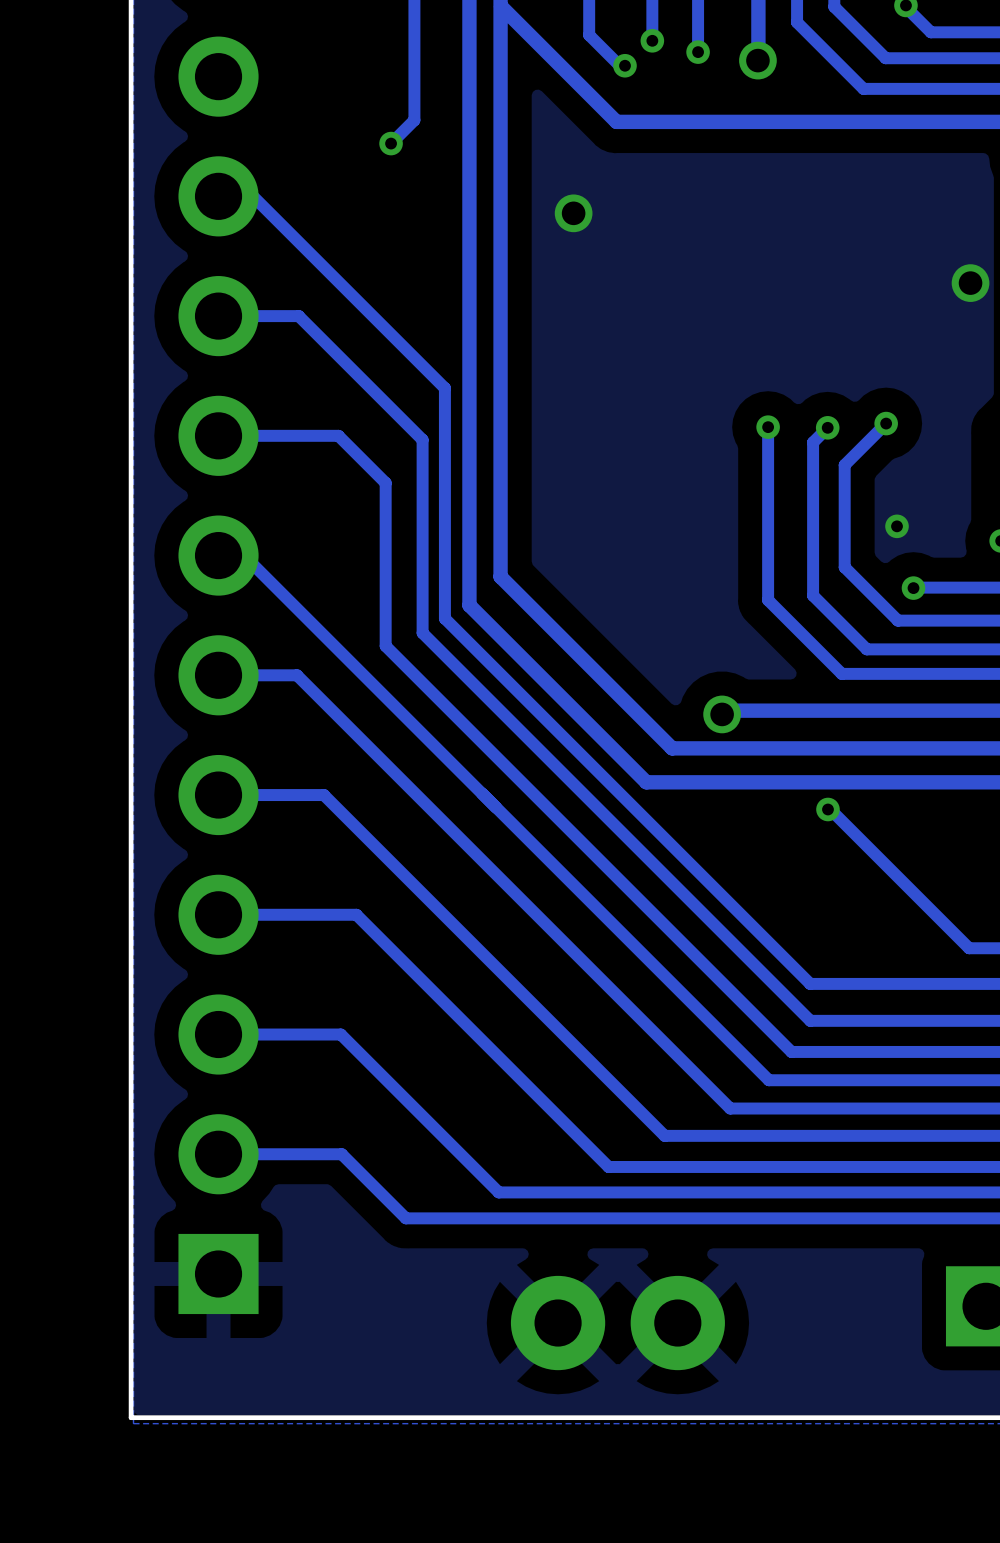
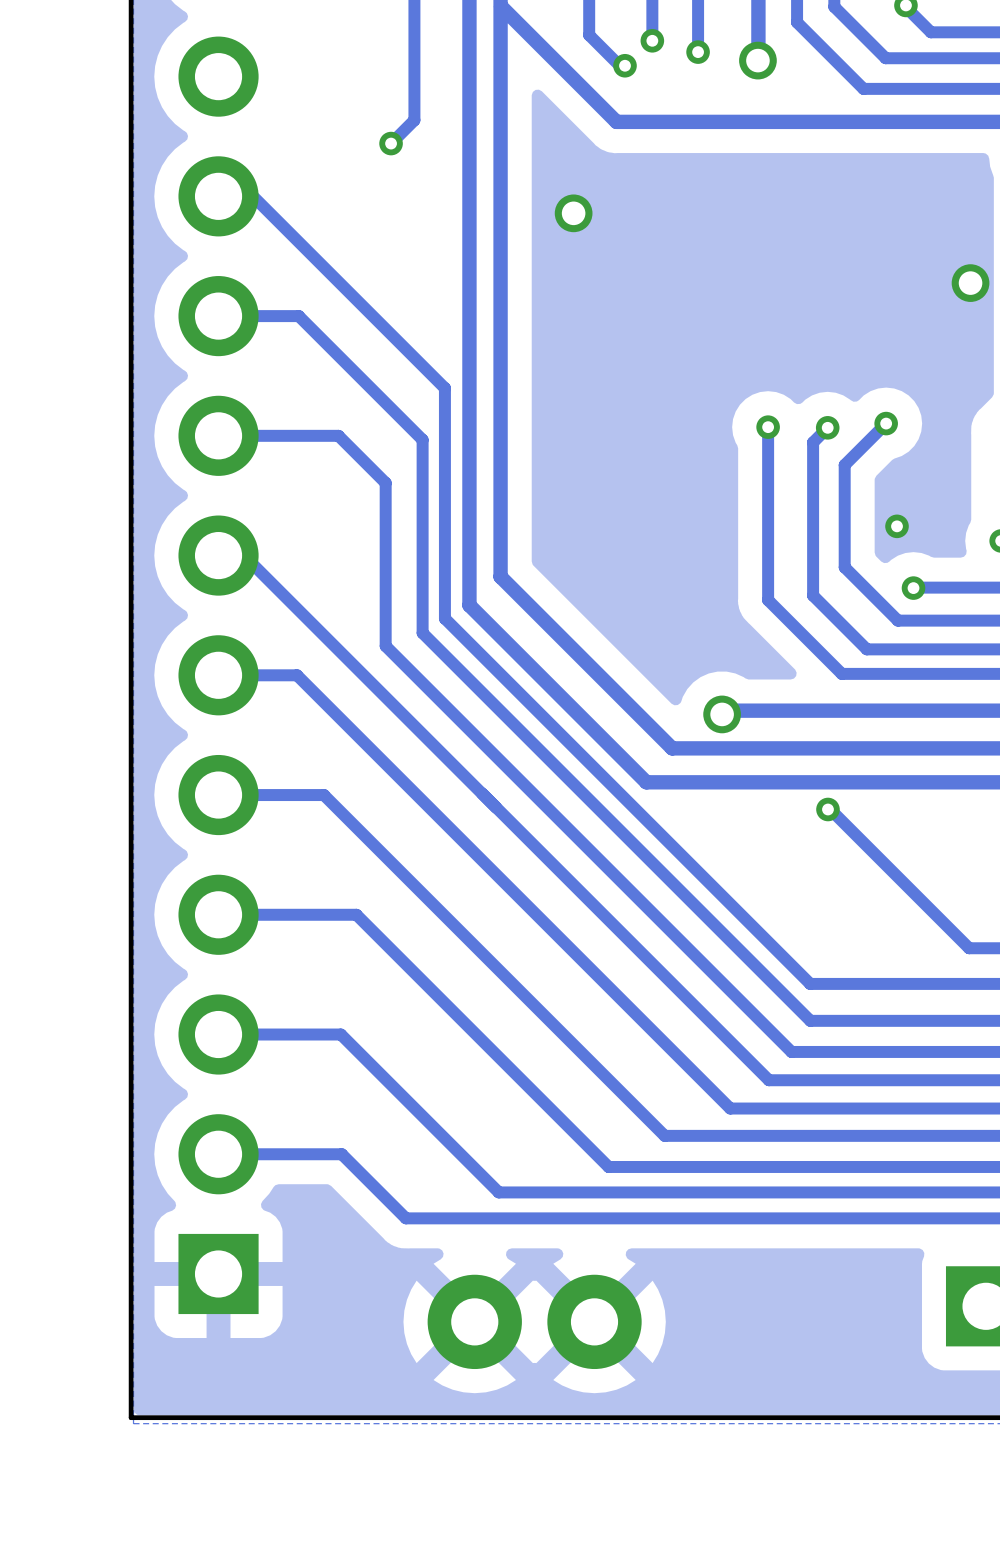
part position: (617, 1323) -> (534, 1321)

